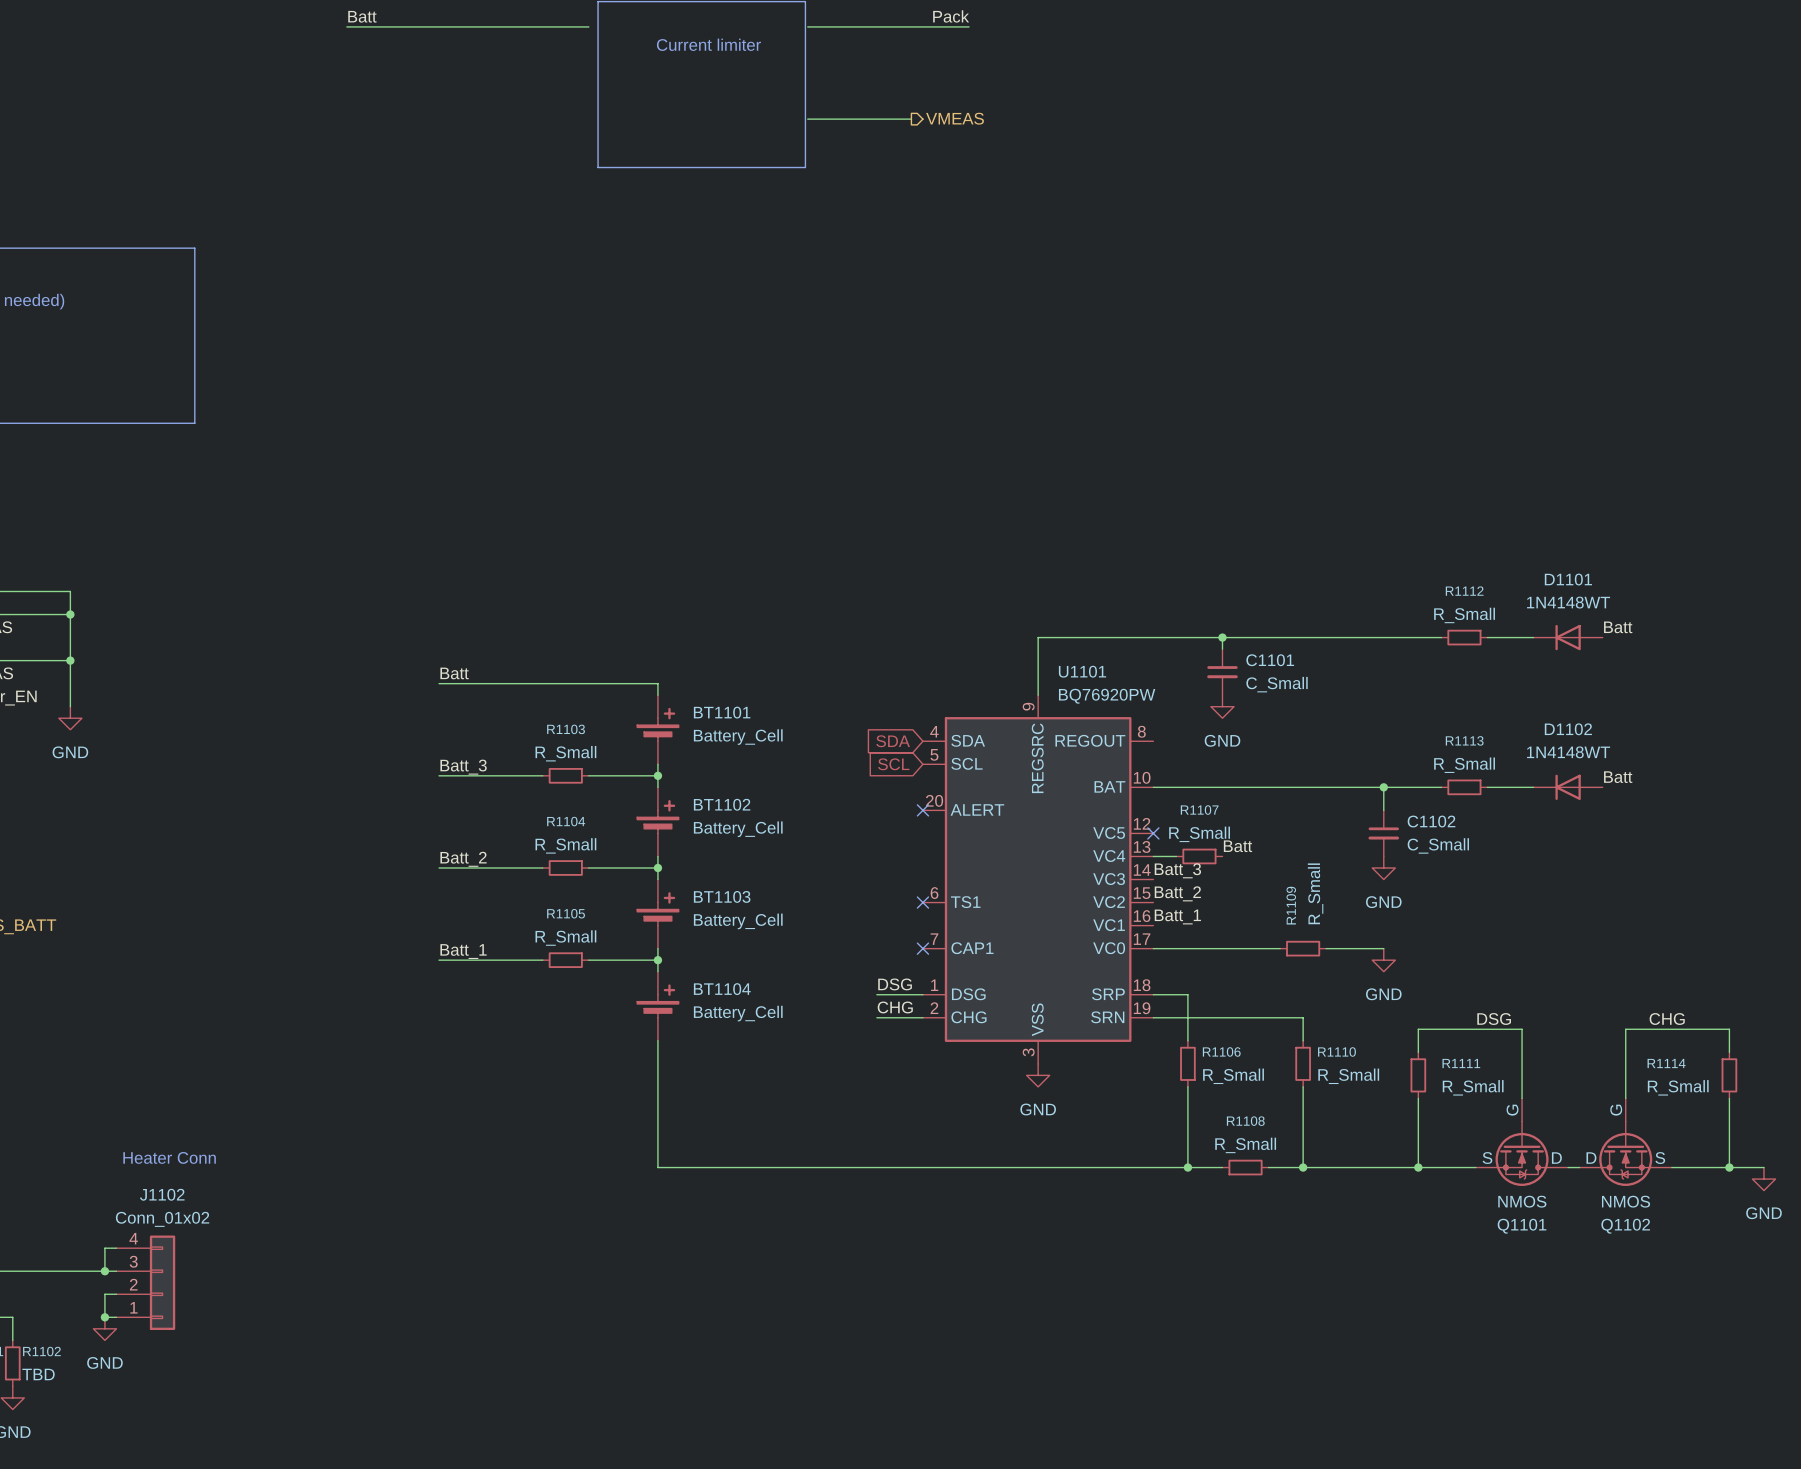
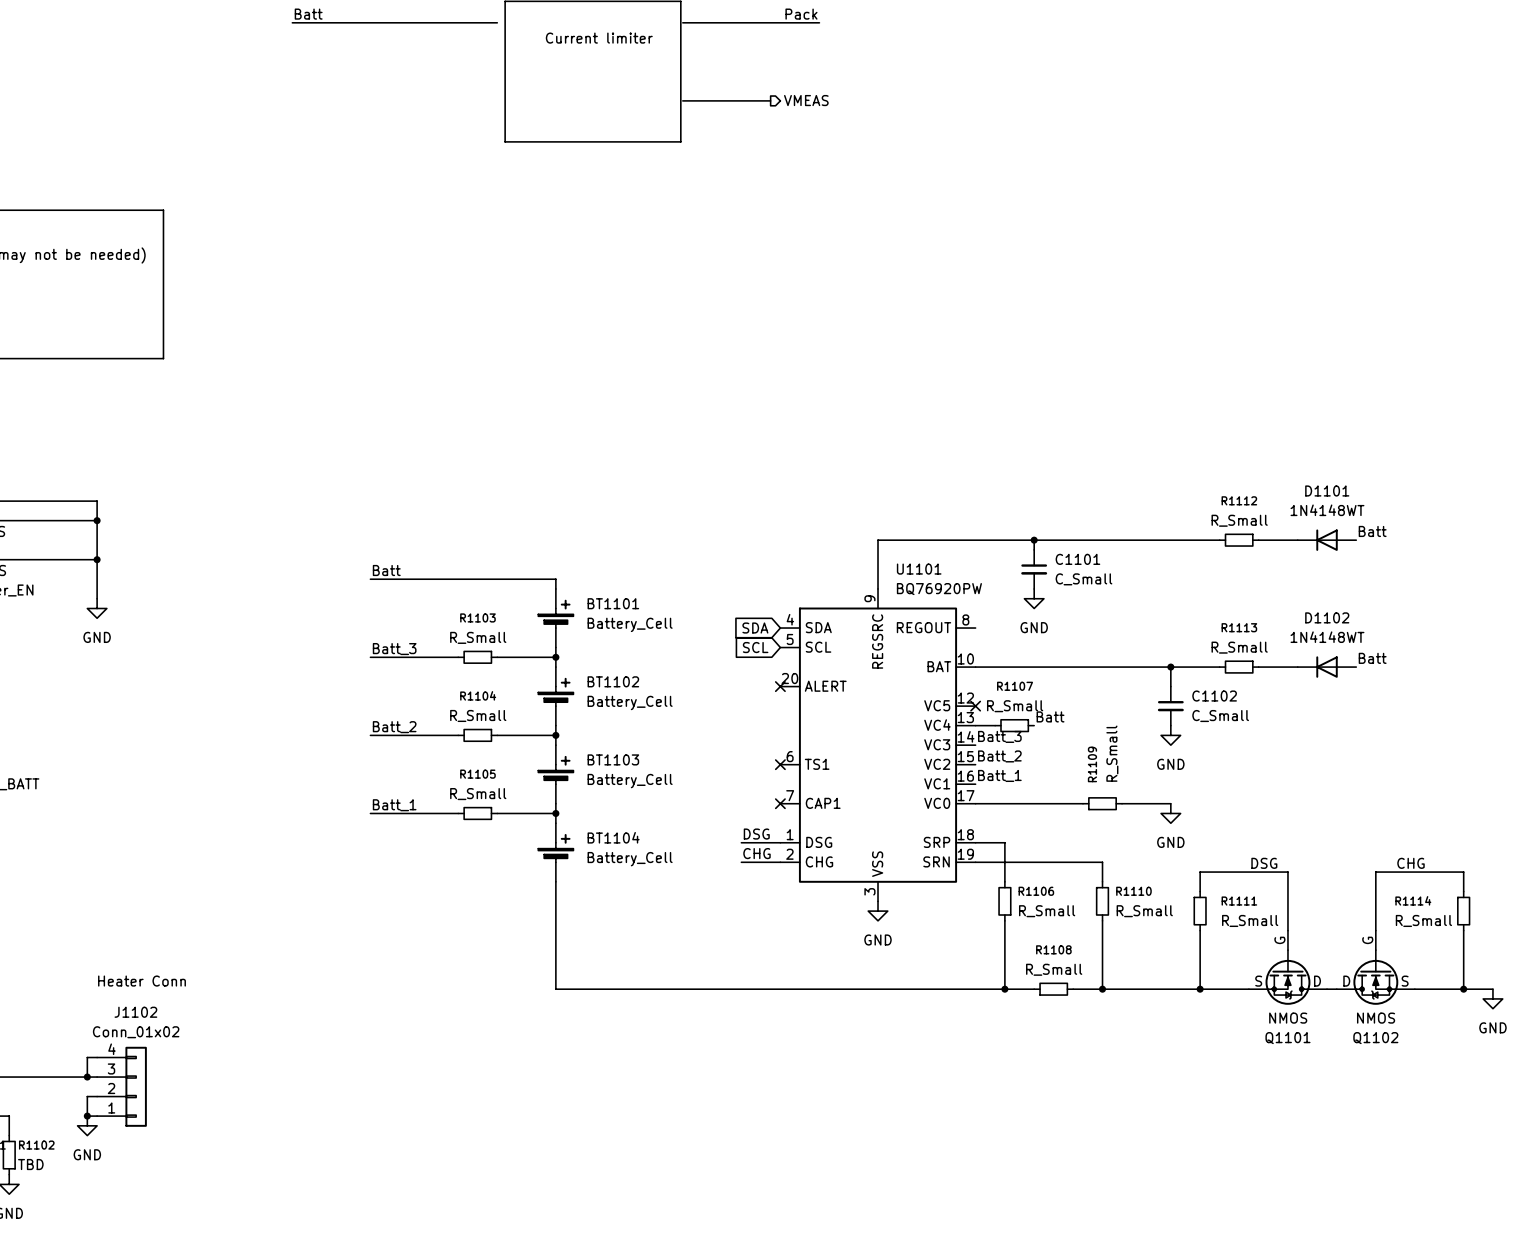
wire: (70, 591) (70, 706) -> (58, 501) (97, 501) (97, 598)
wire: none -> (58, 520) (97, 520)
junction: (70, 614) -> none
junction: none -> (97, 520)
wire: none -> (58, 559) (97, 559)
junction: (70, 660) -> none
junction: none -> (97, 559)
power symbol position: GND (70, 718) -> GND (97, 608)

